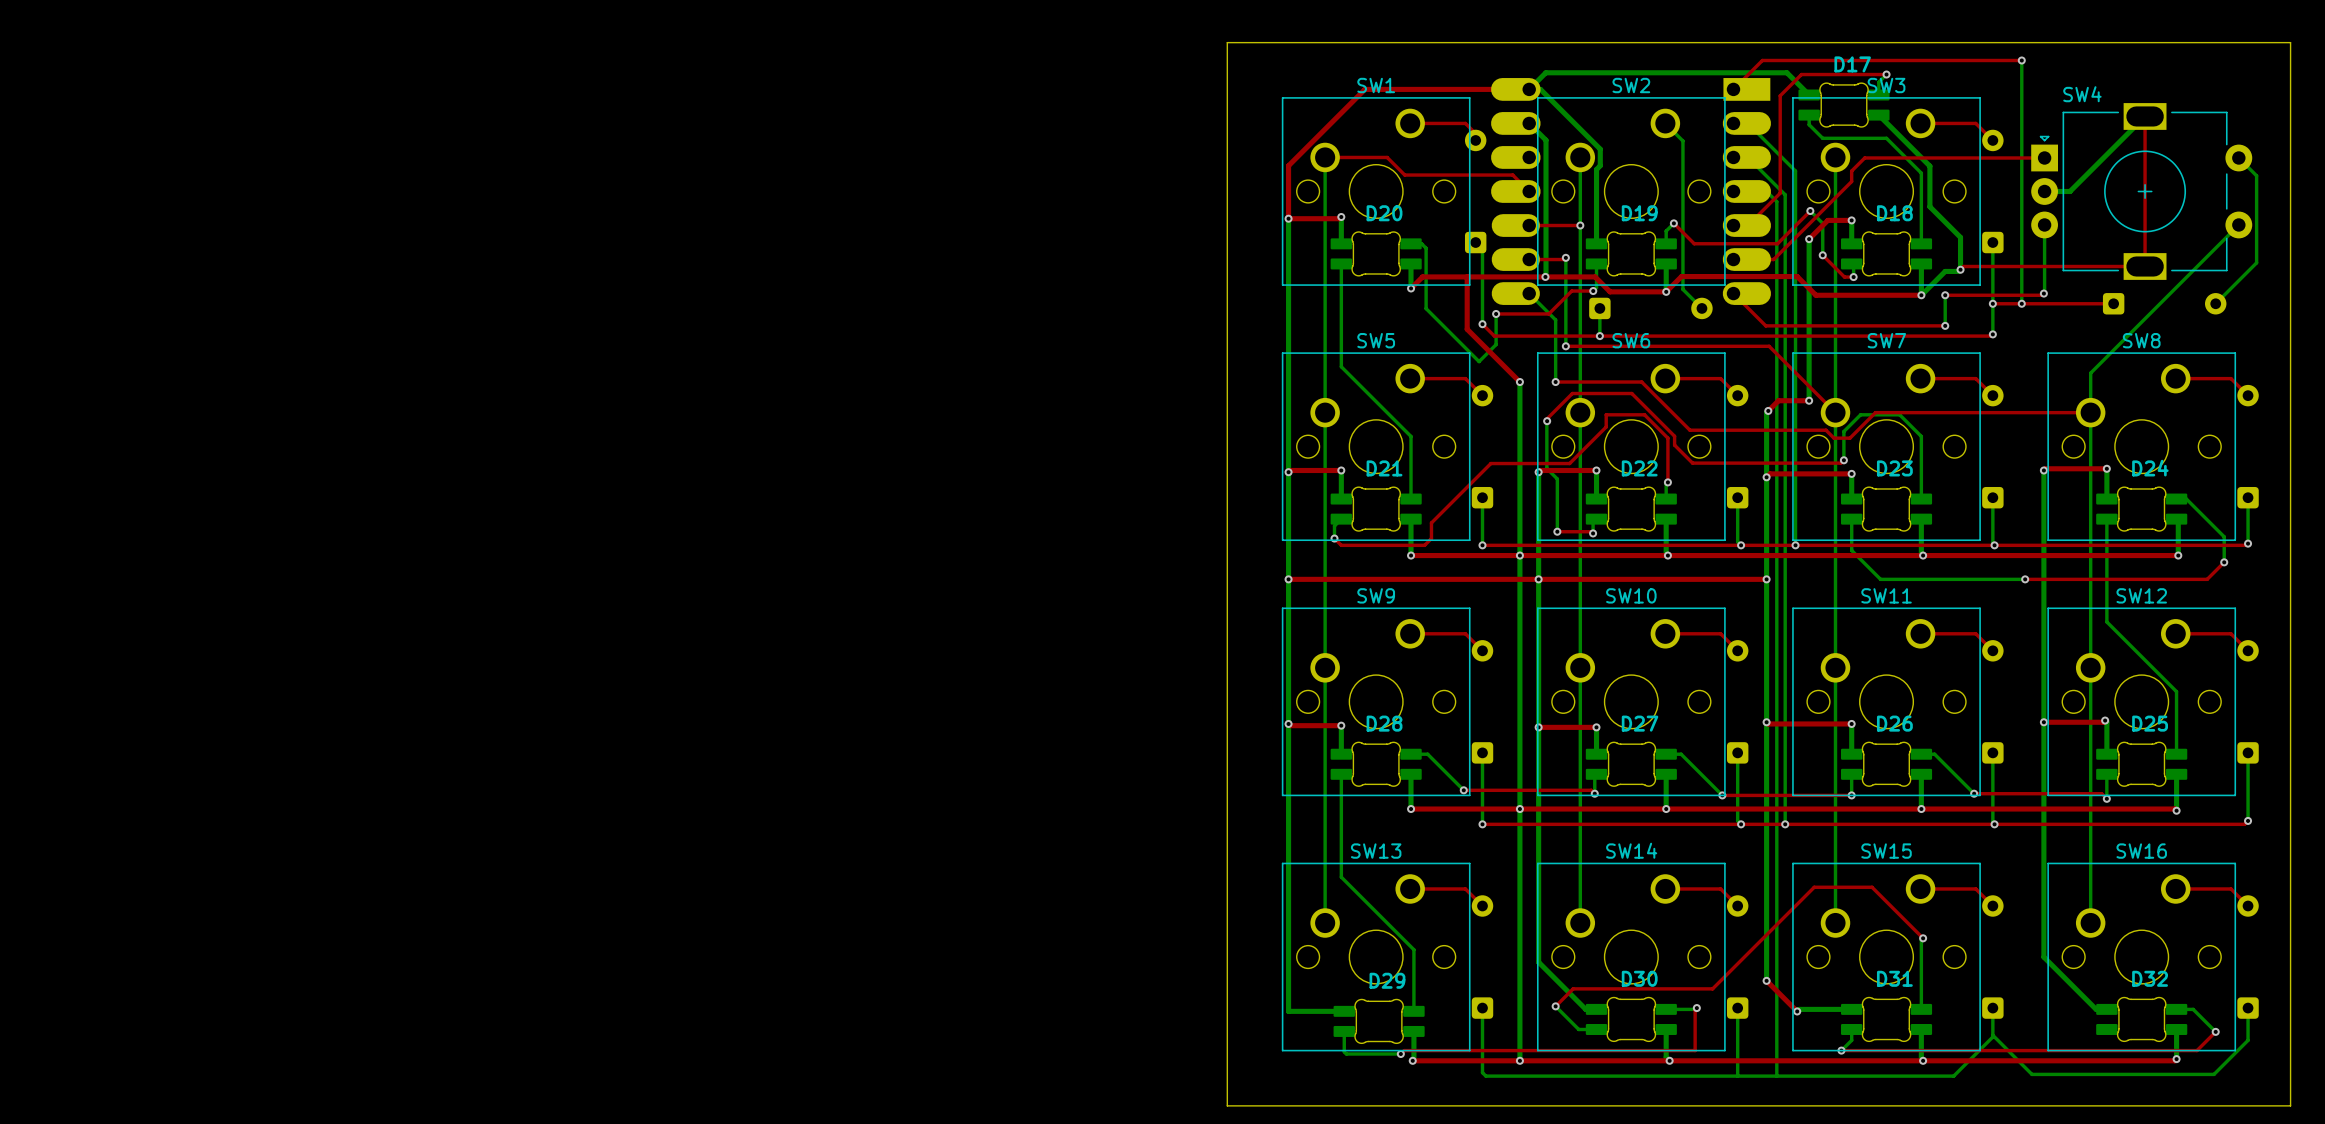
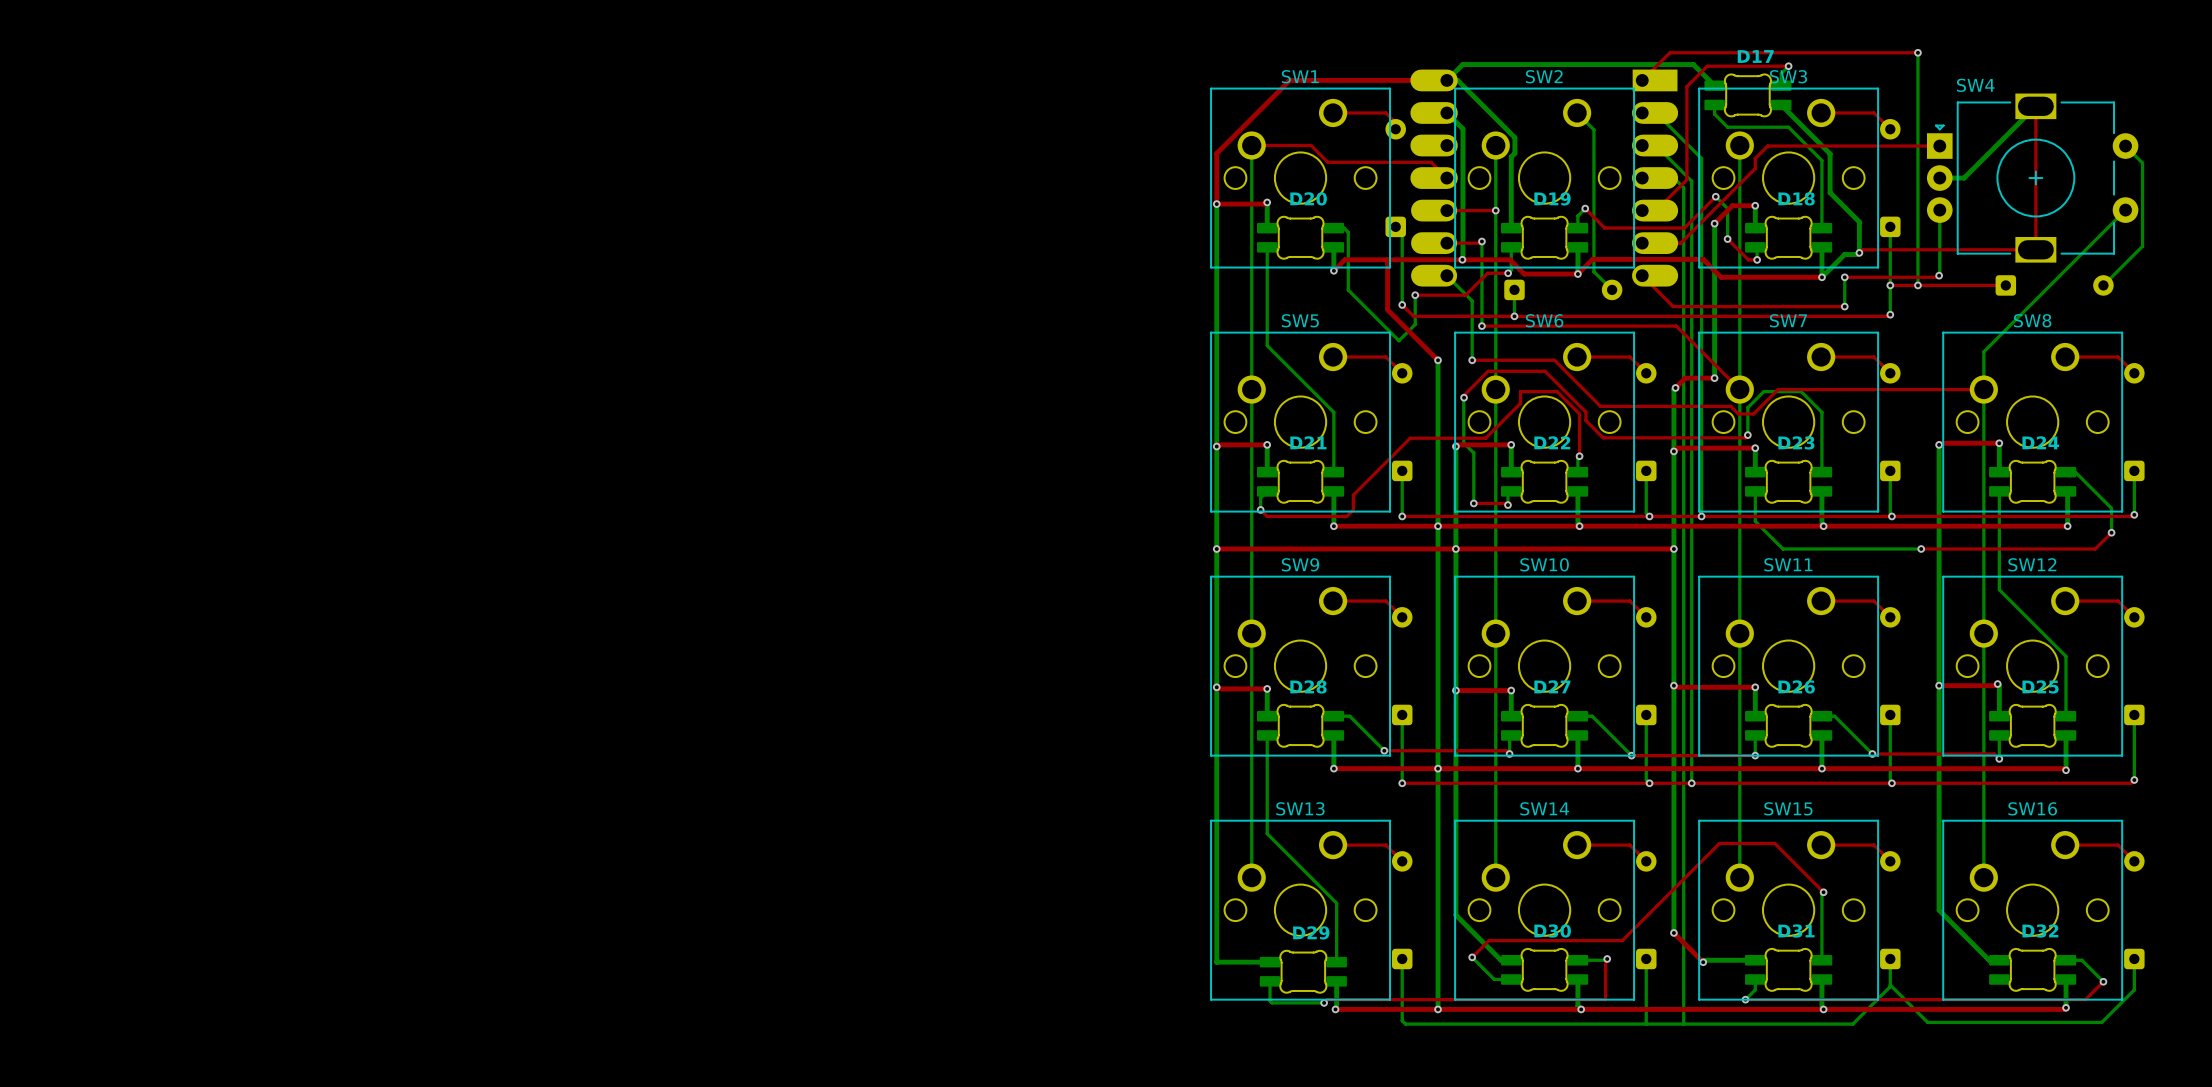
board edge: (1227, 42) (2290, 42) (2290, 1105) (1227, 1105) (1227, 42) -> none

